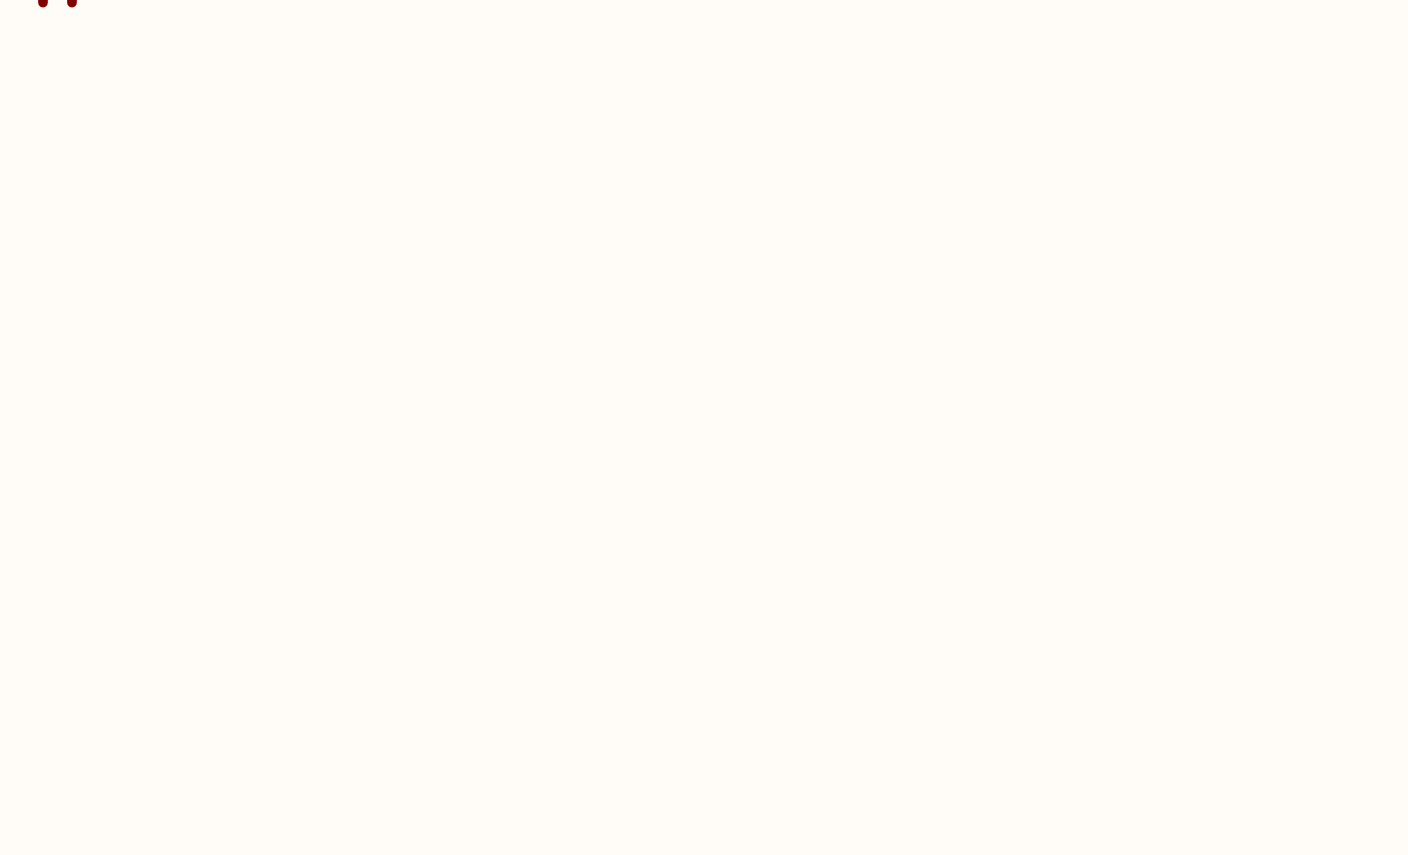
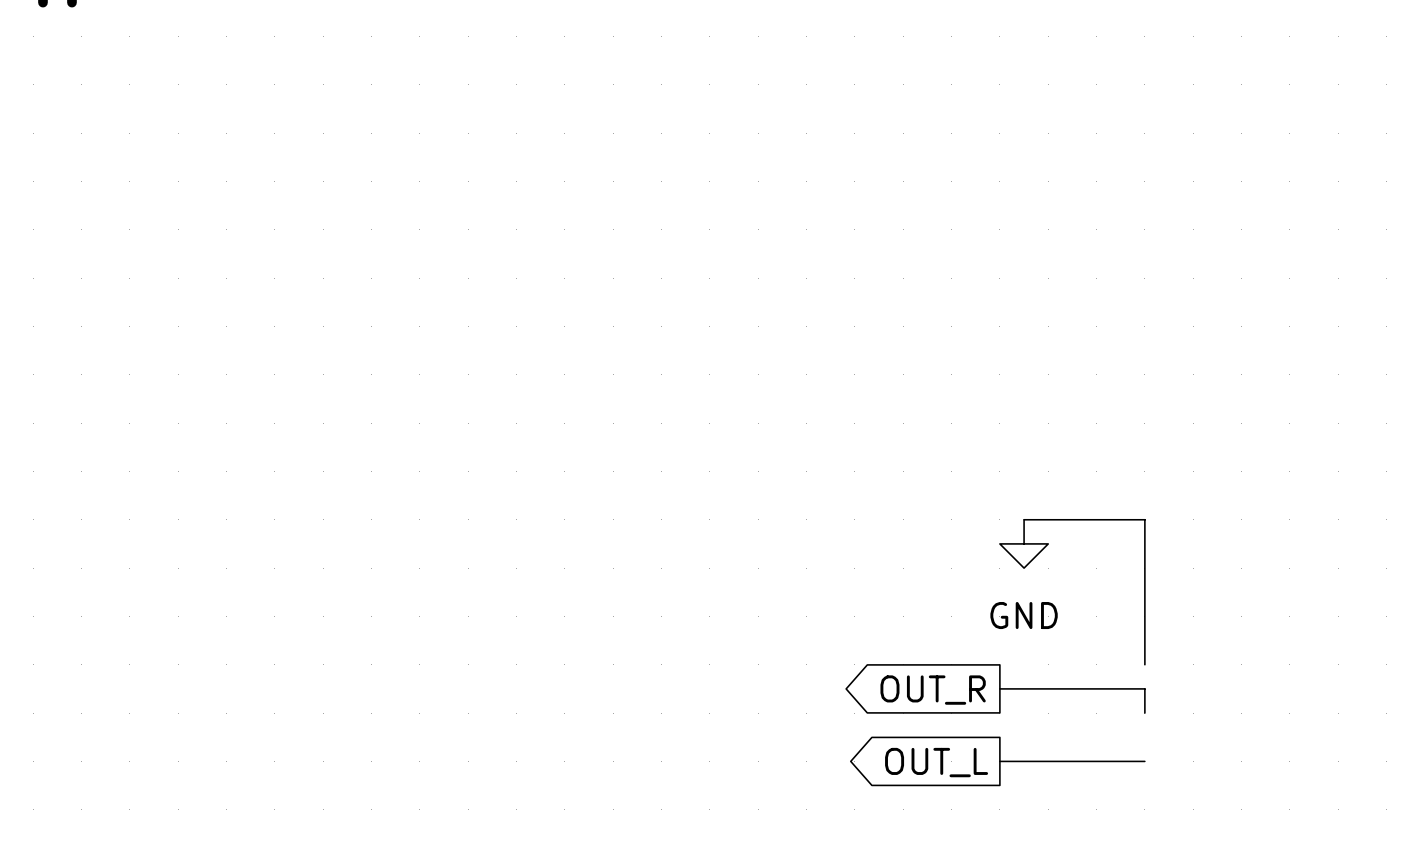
wire: none -> (1024, 519) (1144, 519) (1144, 664)
power symbol: none -> GND (1024, 543)
wire: none -> (999, 688) (1144, 688) (1144, 713)
global label: none -> OUT_R (933, 690)
wire: none -> (999, 761) (1144, 761)
global label: none -> OUT_L (936, 762)

